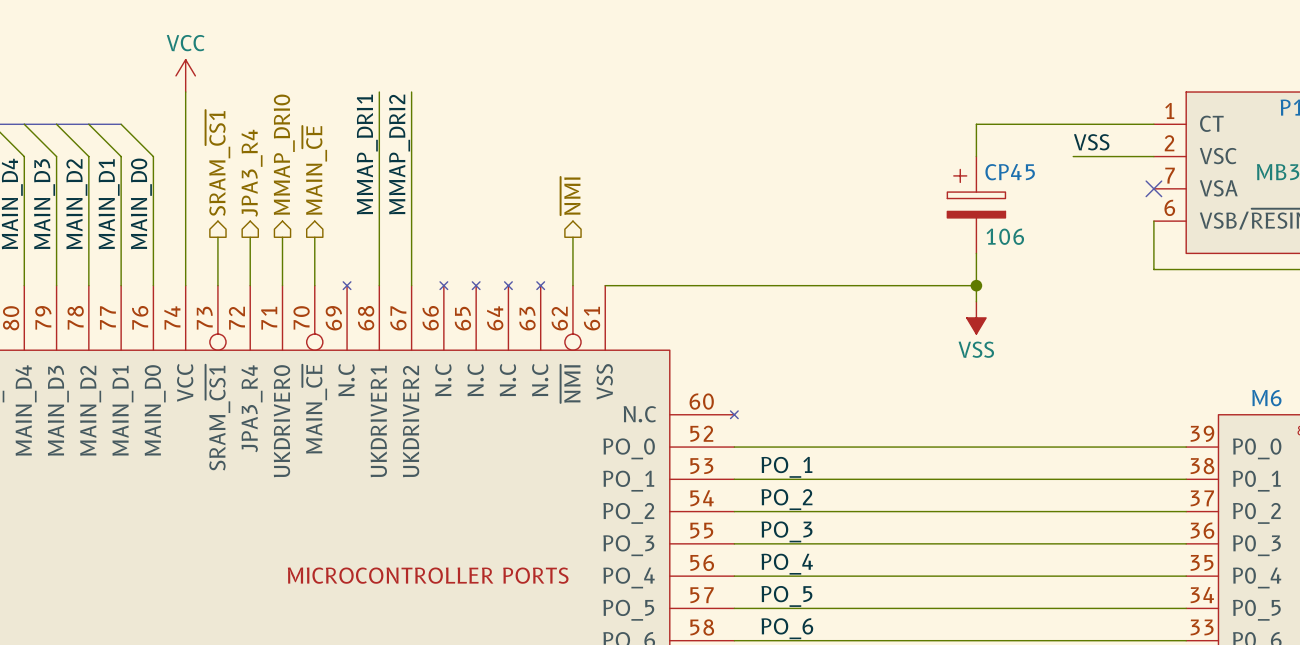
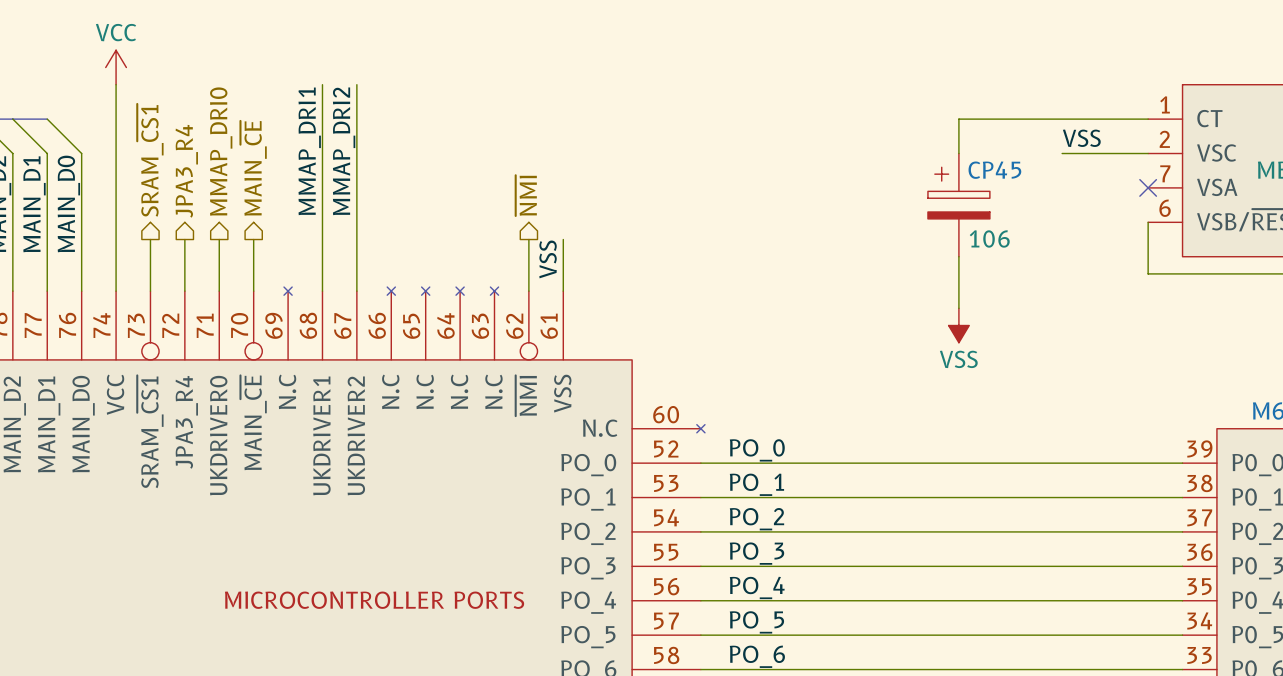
label: none -> VSS (548, 259)
wire: (605, 285) (976, 285) -> (563, 291) (563, 239)
junction: (976, 285) -> none
label: none -> PO_0 (757, 450)

